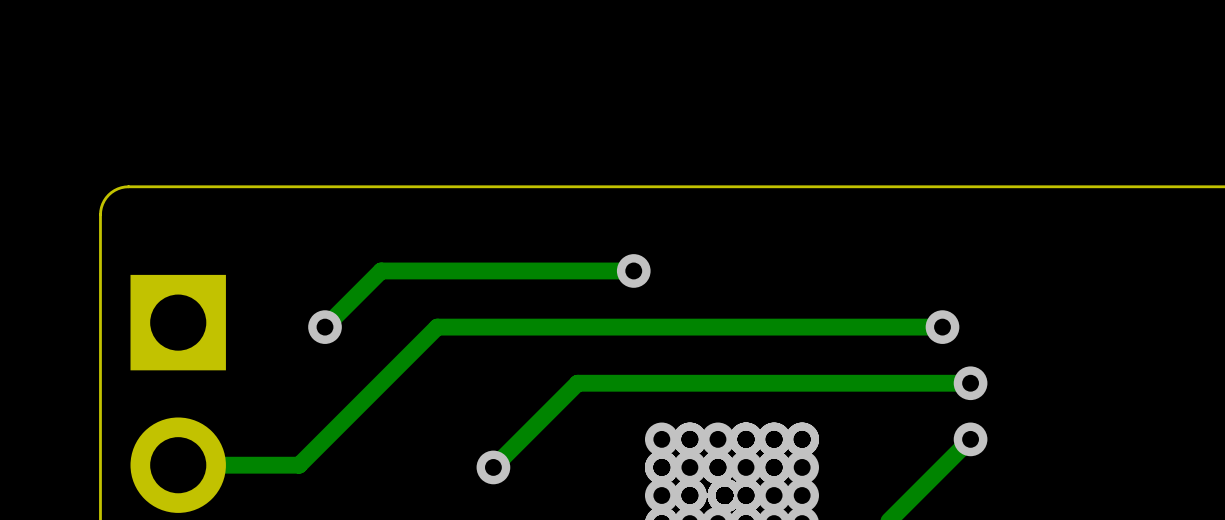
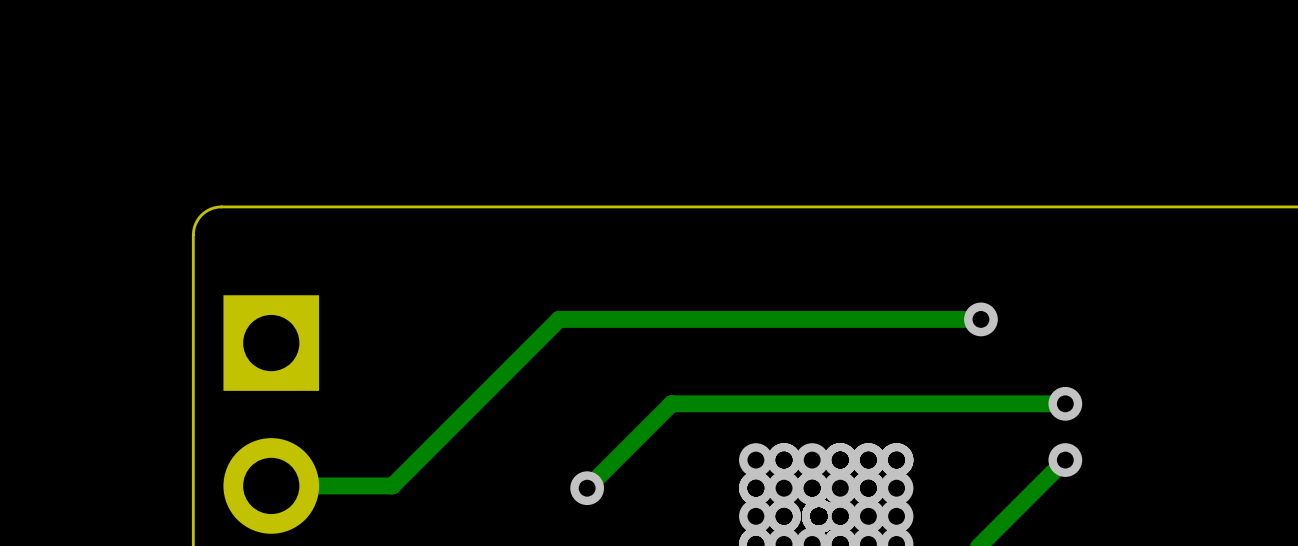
track: (633, 270) (381, 270) (325, 327) -> none
via: (633, 270) -> none
via: (325, 327) -> none
track: (942, 327) (437, 327) -> (980, 319) (559, 319) (530, 347)
via position: (942, 327) -> (980, 319)

